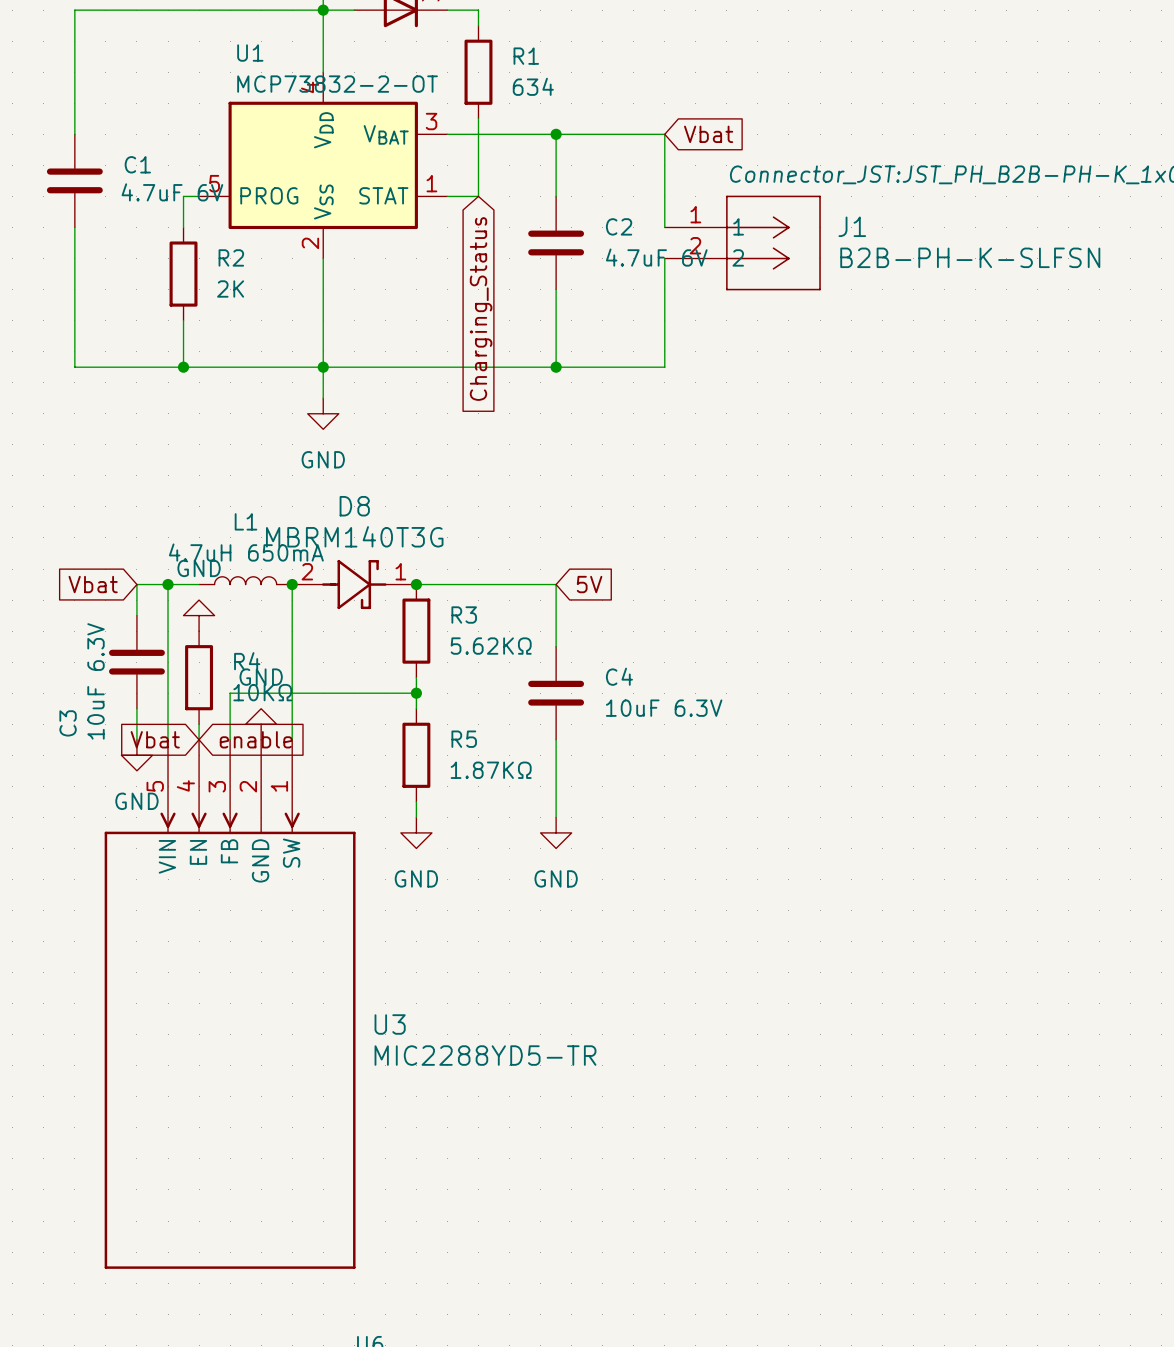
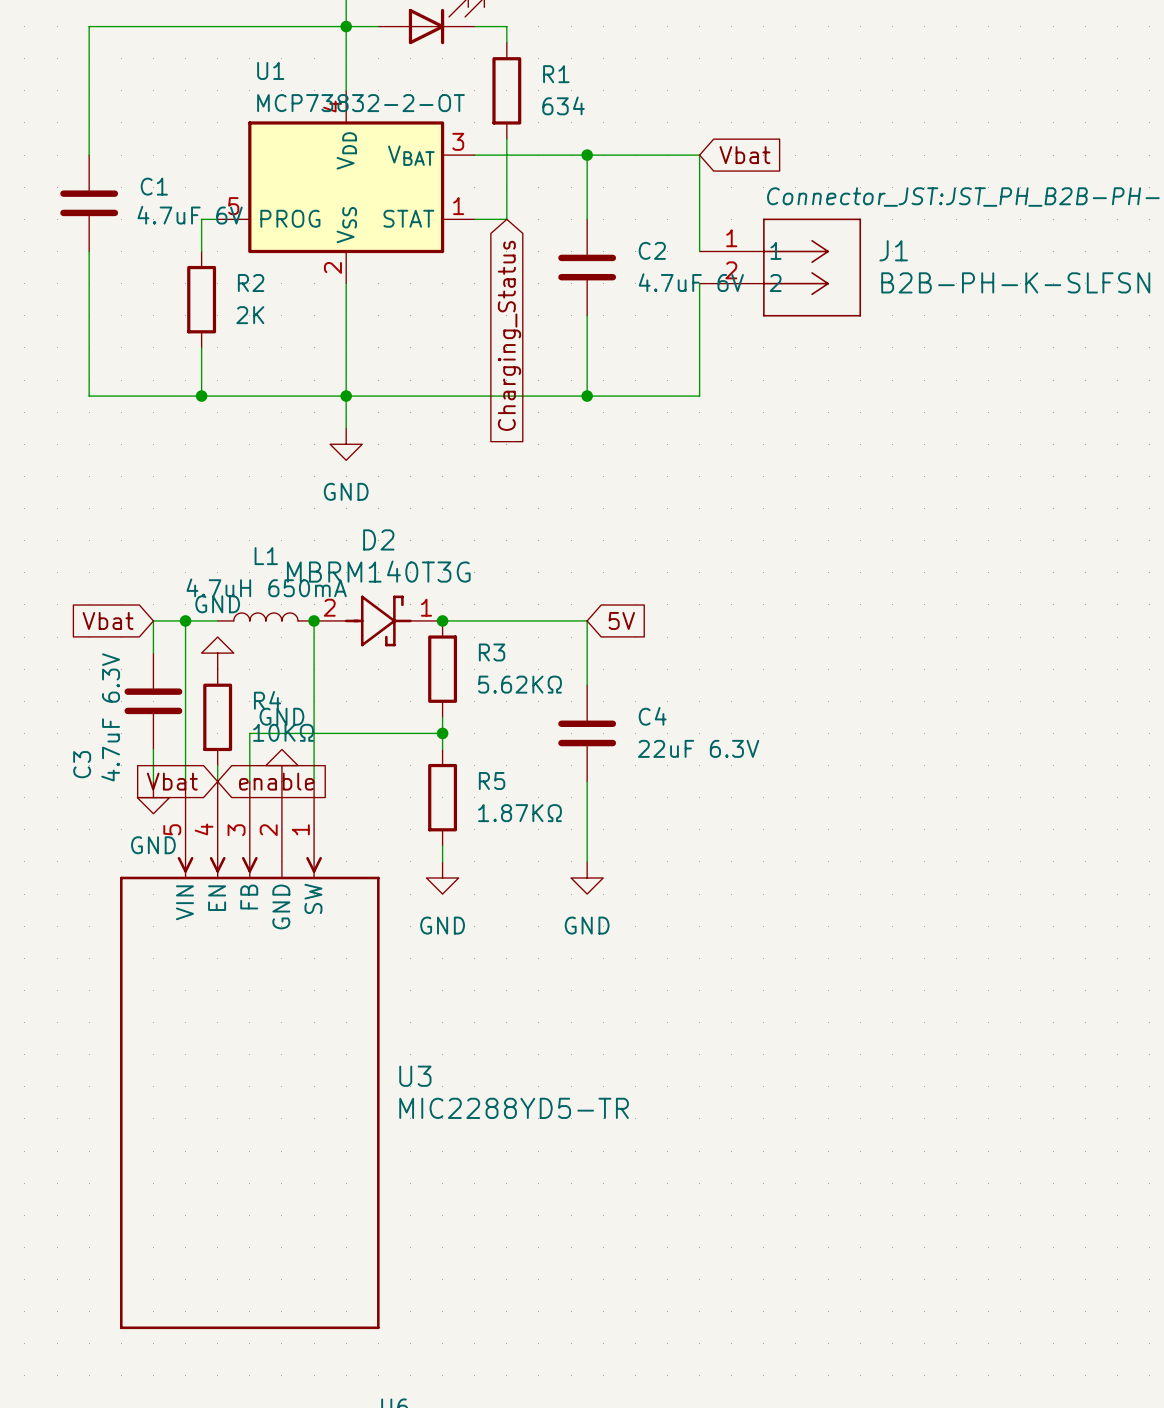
D8 name: D8 (354, 506) -> D2 (378, 539)
C3 value: 10uF 6.3V (96, 681) -> 4.7uF 6.3V (110, 717)
C4 value: 10uF 6.3V (664, 708) -> 22uF 6.3V (698, 748)

